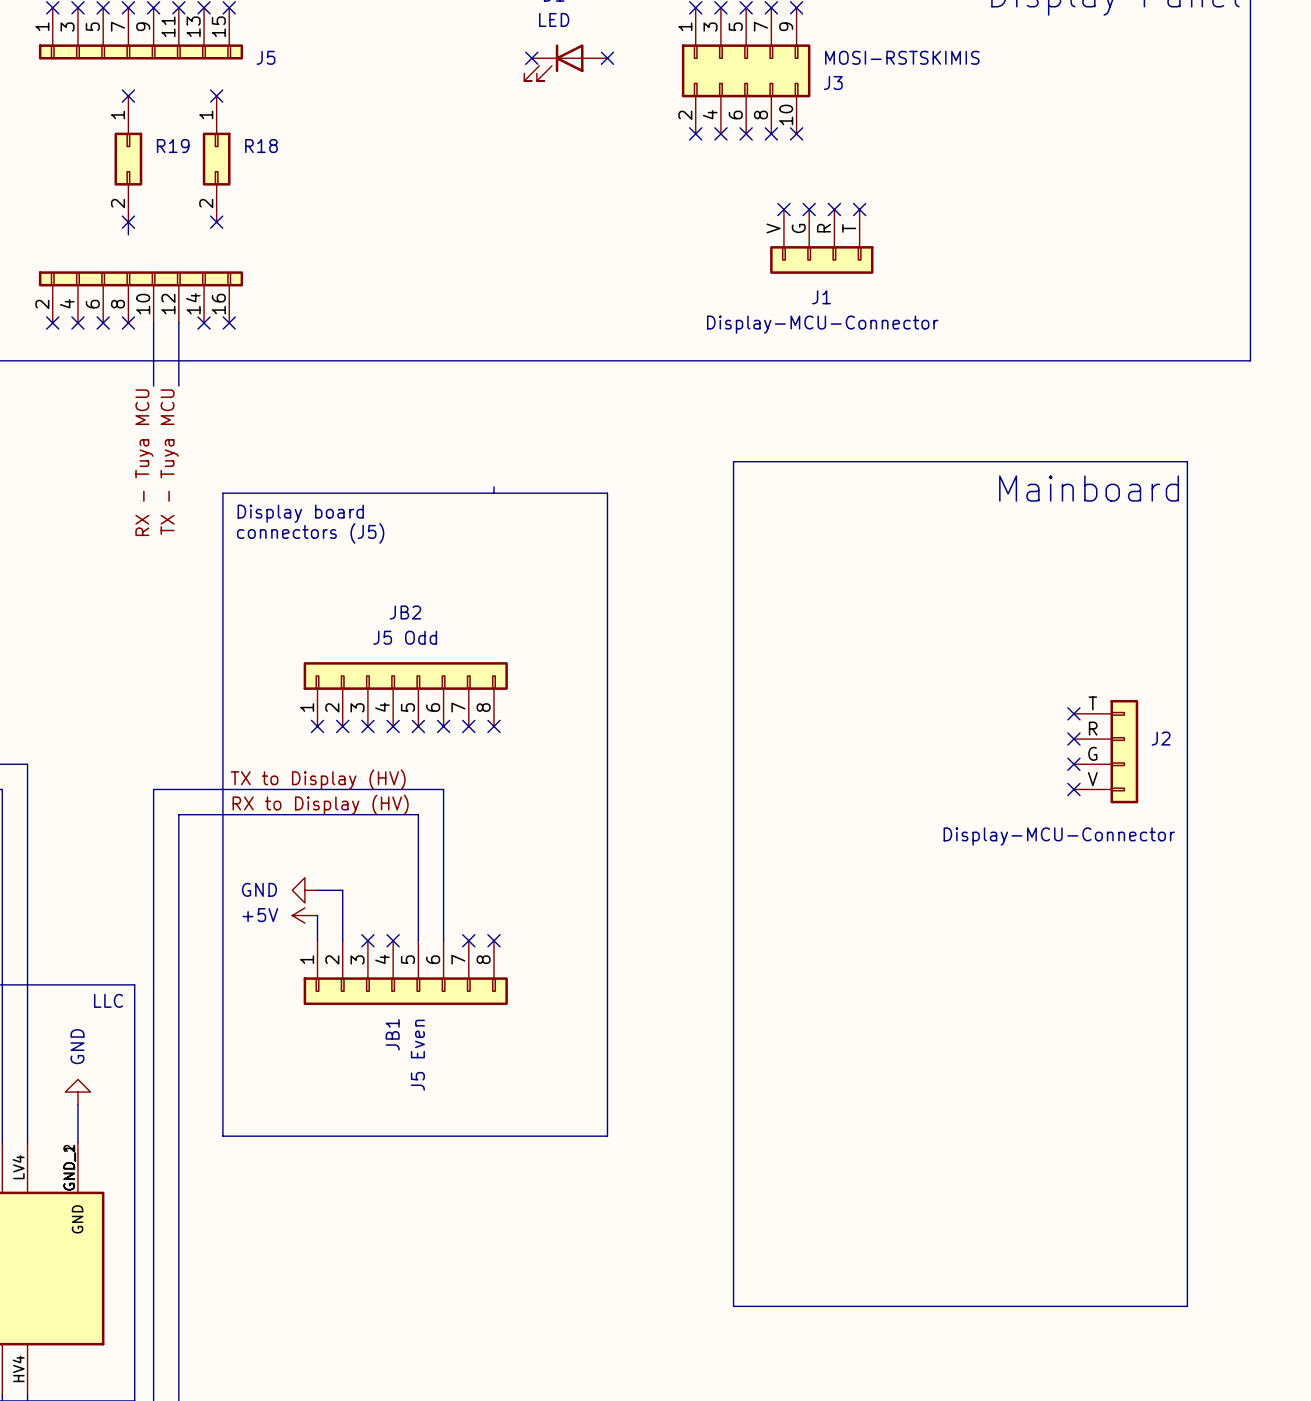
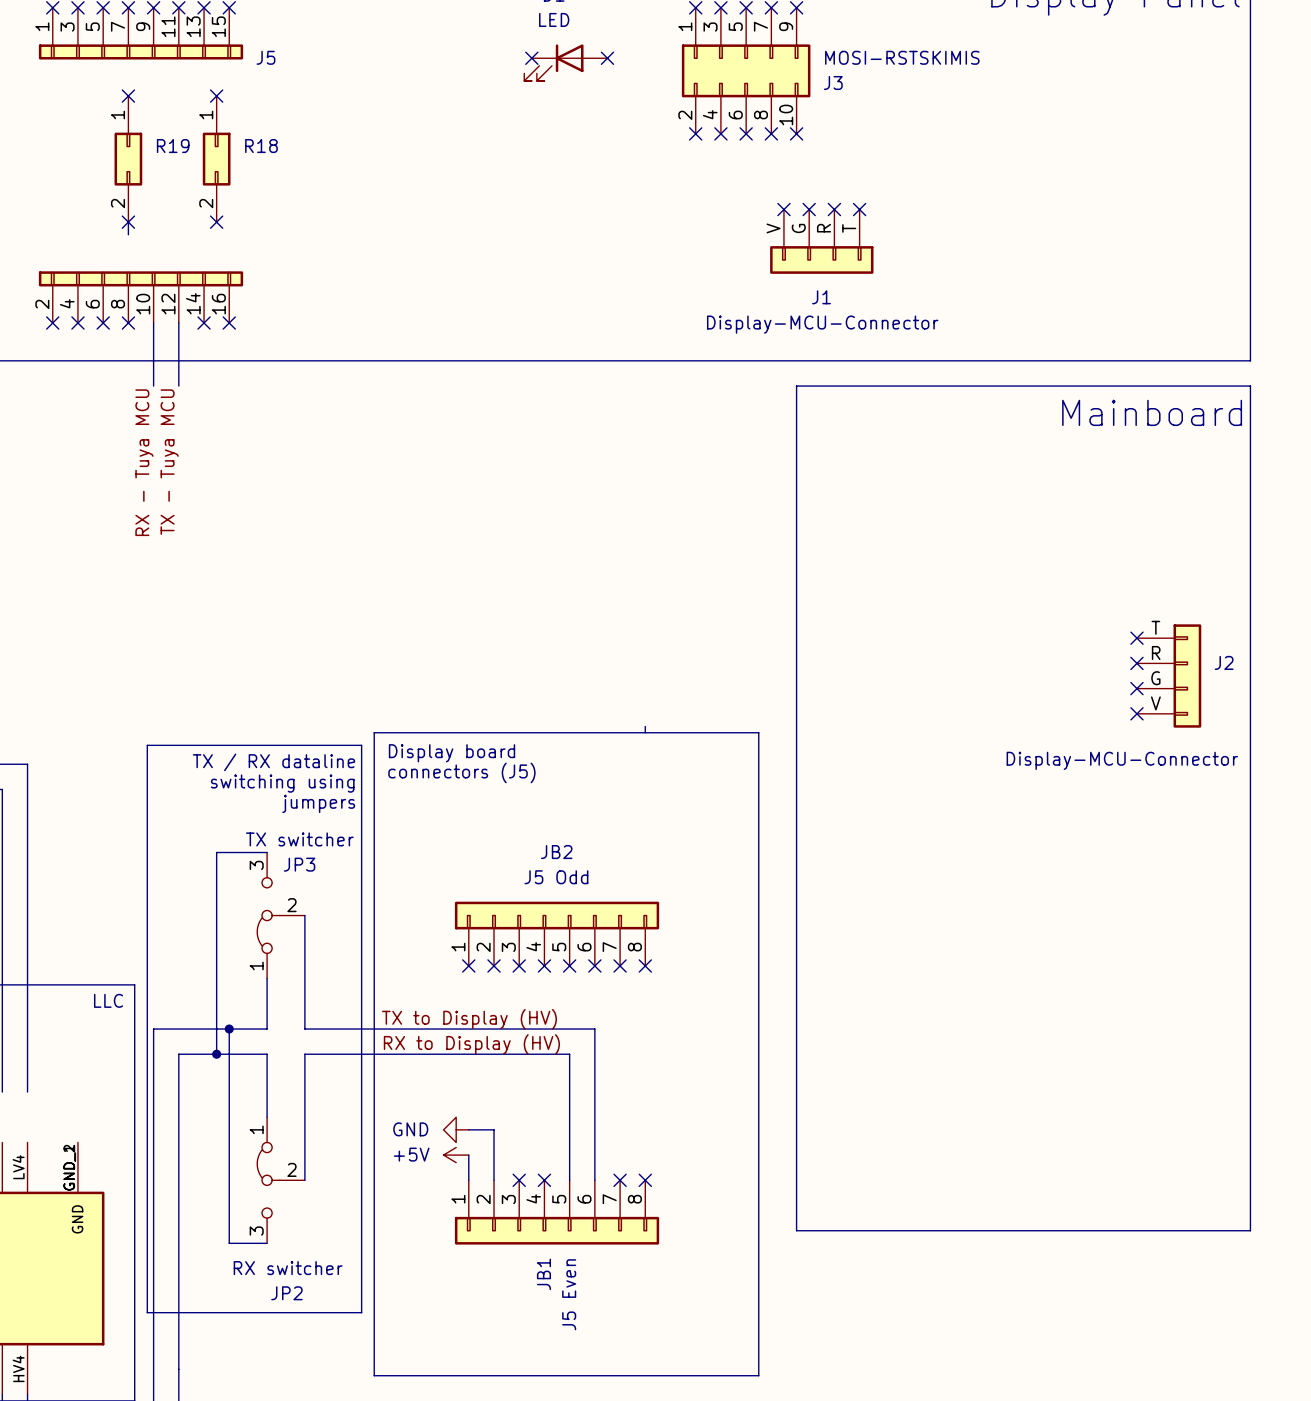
line: (733, 461) (1187, 461) (1187, 1306) (733, 1306) (733, 461) -> (796, 386) (1250, 386) (1250, 1230) (796, 1230) (796, 386)
line: (494, 486) (494, 493) -> none
text position: Mainboard (1089, 488) -> Mainboard (1152, 412)
line: (222, 493) (607, 493) (607, 1136) (222, 1136) (222, 493) -> none
text: Display board (300, 513) -> none
text: connectors (J5) (310, 533) -> none
no-connect mark: none -> (1136, 638)
no-connect mark: none -> (1136, 663)
no-connect mark: none -> (1136, 688)
JB2 position: (405, 694) -> (557, 933)
no-connect mark: (1073, 713) -> none
no-connect mark: none -> (1136, 713)
no-connect mark: (317, 726) -> none
no-connect mark: (342, 726) -> none
no-connect mark: (367, 726) -> none
no-connect mark: (393, 726) -> none
no-connect mark: (418, 726) -> none
no-connect mark: (443, 726) -> none
no-connect mark: (468, 726) -> none
no-connect mark: (494, 726) -> none
line: none -> (645, 726) (645, 732)
line: none -> (374, 732) (758, 732) (758, 1375) (374, 1375) (374, 732)
no-connect mark: (1073, 739) -> none
line: none -> (147, 745) (361, 745) (361, 1312) (147, 1312) (147, 745)
J2 position: (1106, 751) -> (1169, 676)
text: none -> Display board (452, 753)
text: none -> TX / RX dataline (274, 762)
no-connect mark: (1073, 764) -> none
text: none -> connectors (J5) (461, 772)
label: TX to Display (HV) (318, 779) -> none
text: none -> switching using (282, 783)
no-connect mark: (1073, 789) -> none
text: none -> jumpers (318, 803)
label: RX to Display (HV) (320, 804) -> none
wire: none -> (267, 852) (216, 852) (216, 1054)
power symbol: GND (304, 890) -> none
wire: (317, 890) (342, 890) (342, 940) -> none
JP3: none -> TX switcher (281, 915)
wire: none -> (304, 915) (304, 1029) (594, 1029) (594, 1180)
power symbol: +5V (304, 915) -> none
wire: (317, 915) (317, 940) -> none
no-connect mark: (367, 940) -> none
no-connect mark: (393, 940) -> none
wire: (418, 940) (418, 814) (178, 814) (178, 1054) -> (267, 1117) (267, 1054) (178, 1054)
wire: (443, 940) (443, 789) (153, 789) (153, 1029) -> (267, 978) (267, 1029) (153, 1029)
no-connect mark: (468, 940) -> none
no-connect mark: (494, 940) -> none
no-connect mark: none -> (468, 965)
no-connect mark: none -> (494, 965)
no-connect mark: none -> (519, 965)
no-connect mark: none -> (544, 965)
no-connect mark: none -> (569, 965)
no-connect mark: none -> (594, 965)
no-connect mark: none -> (620, 965)
no-connect mark: none -> (645, 965)
JB1 position: (405, 972) -> (557, 1212)
label: none -> TX to Display (HV) (469, 1019)
wire: none -> (229, 1029) (229, 1243) (267, 1243)
junction: none -> (229, 1029)
label: none -> RX to Display (HV) (471, 1044)
junction: none -> (216, 1054)
wire: (2, 1092) (2, 1142) -> none
wire: (27, 1092) (27, 1142) -> none
power symbol: GND (77, 1092) -> none
wire: (77, 1104) (77, 1142) -> none
power symbol: none -> GND (456, 1129)
wire: none -> (468, 1129) (494, 1129) (494, 1180)
power symbol: none -> +5V (456, 1155)
wire: none -> (468, 1155) (468, 1180)
JP2: none -> RX switcher (281, 1180)
wire: none -> (304, 1180) (304, 1054) (569, 1054) (569, 1180)
no-connect mark: none -> (519, 1180)
no-connect mark: none -> (544, 1180)
no-connect mark: none -> (620, 1180)
no-connect mark: none -> (645, 1180)

